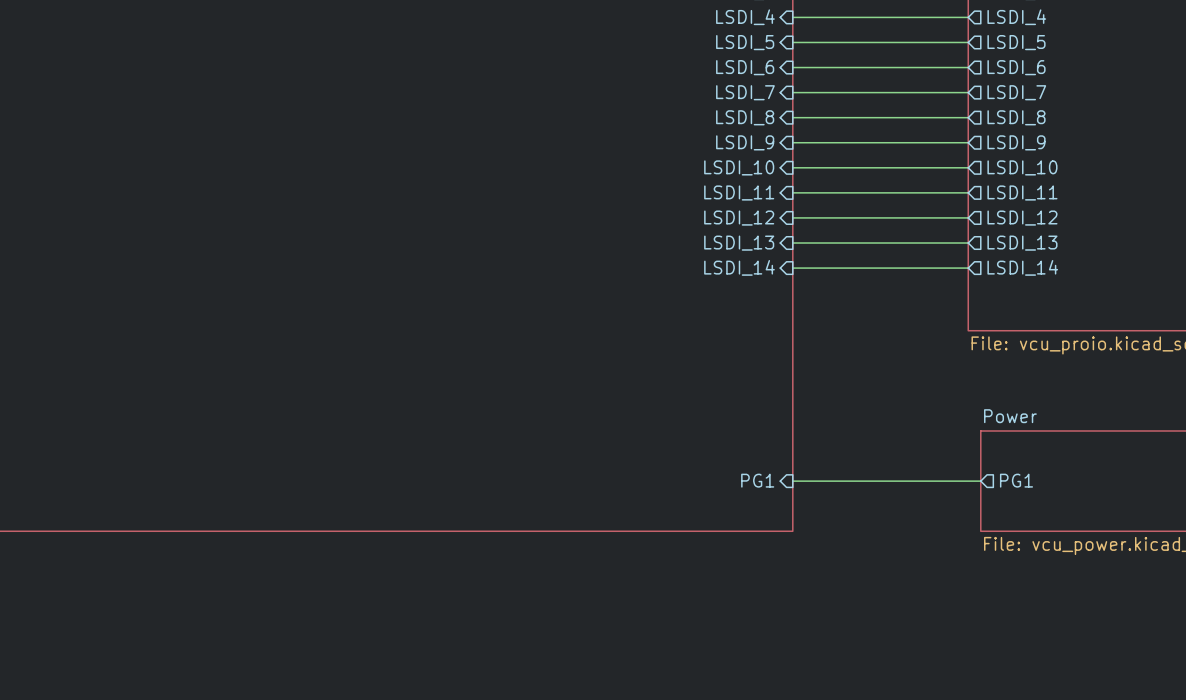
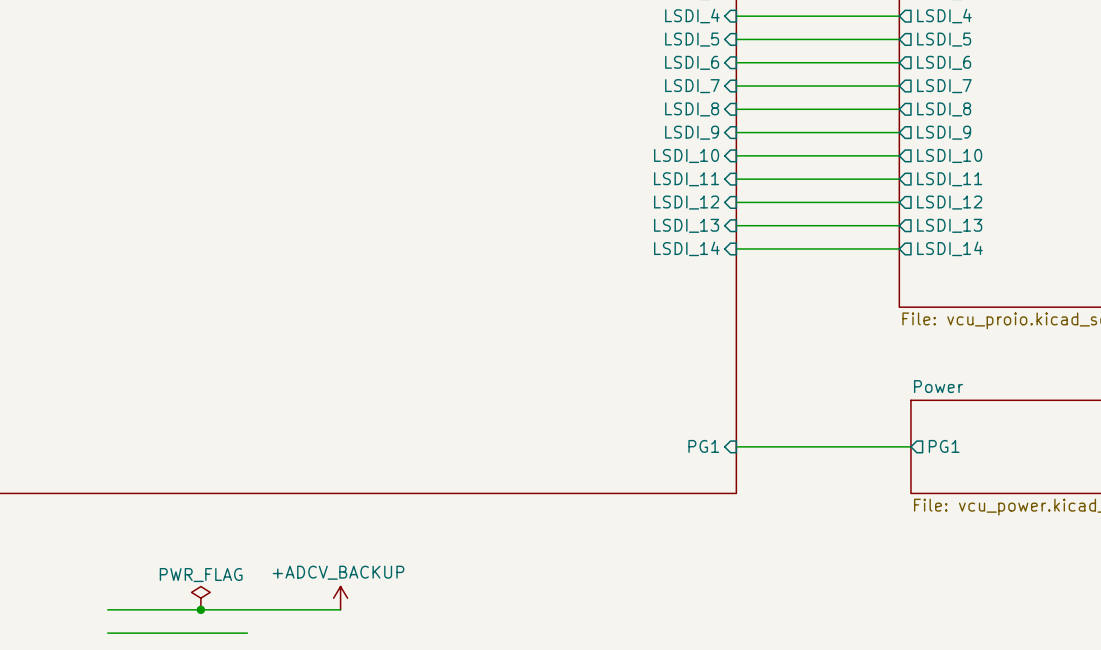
power symbol: none -> PWR_FLAG (200, 598)
power symbol: none -> +ADCV_BACKUP (340, 598)
wire: none -> (107, 609) (340, 609)
junction: none -> (200, 609)
wire: none -> (107, 633) (247, 633)

